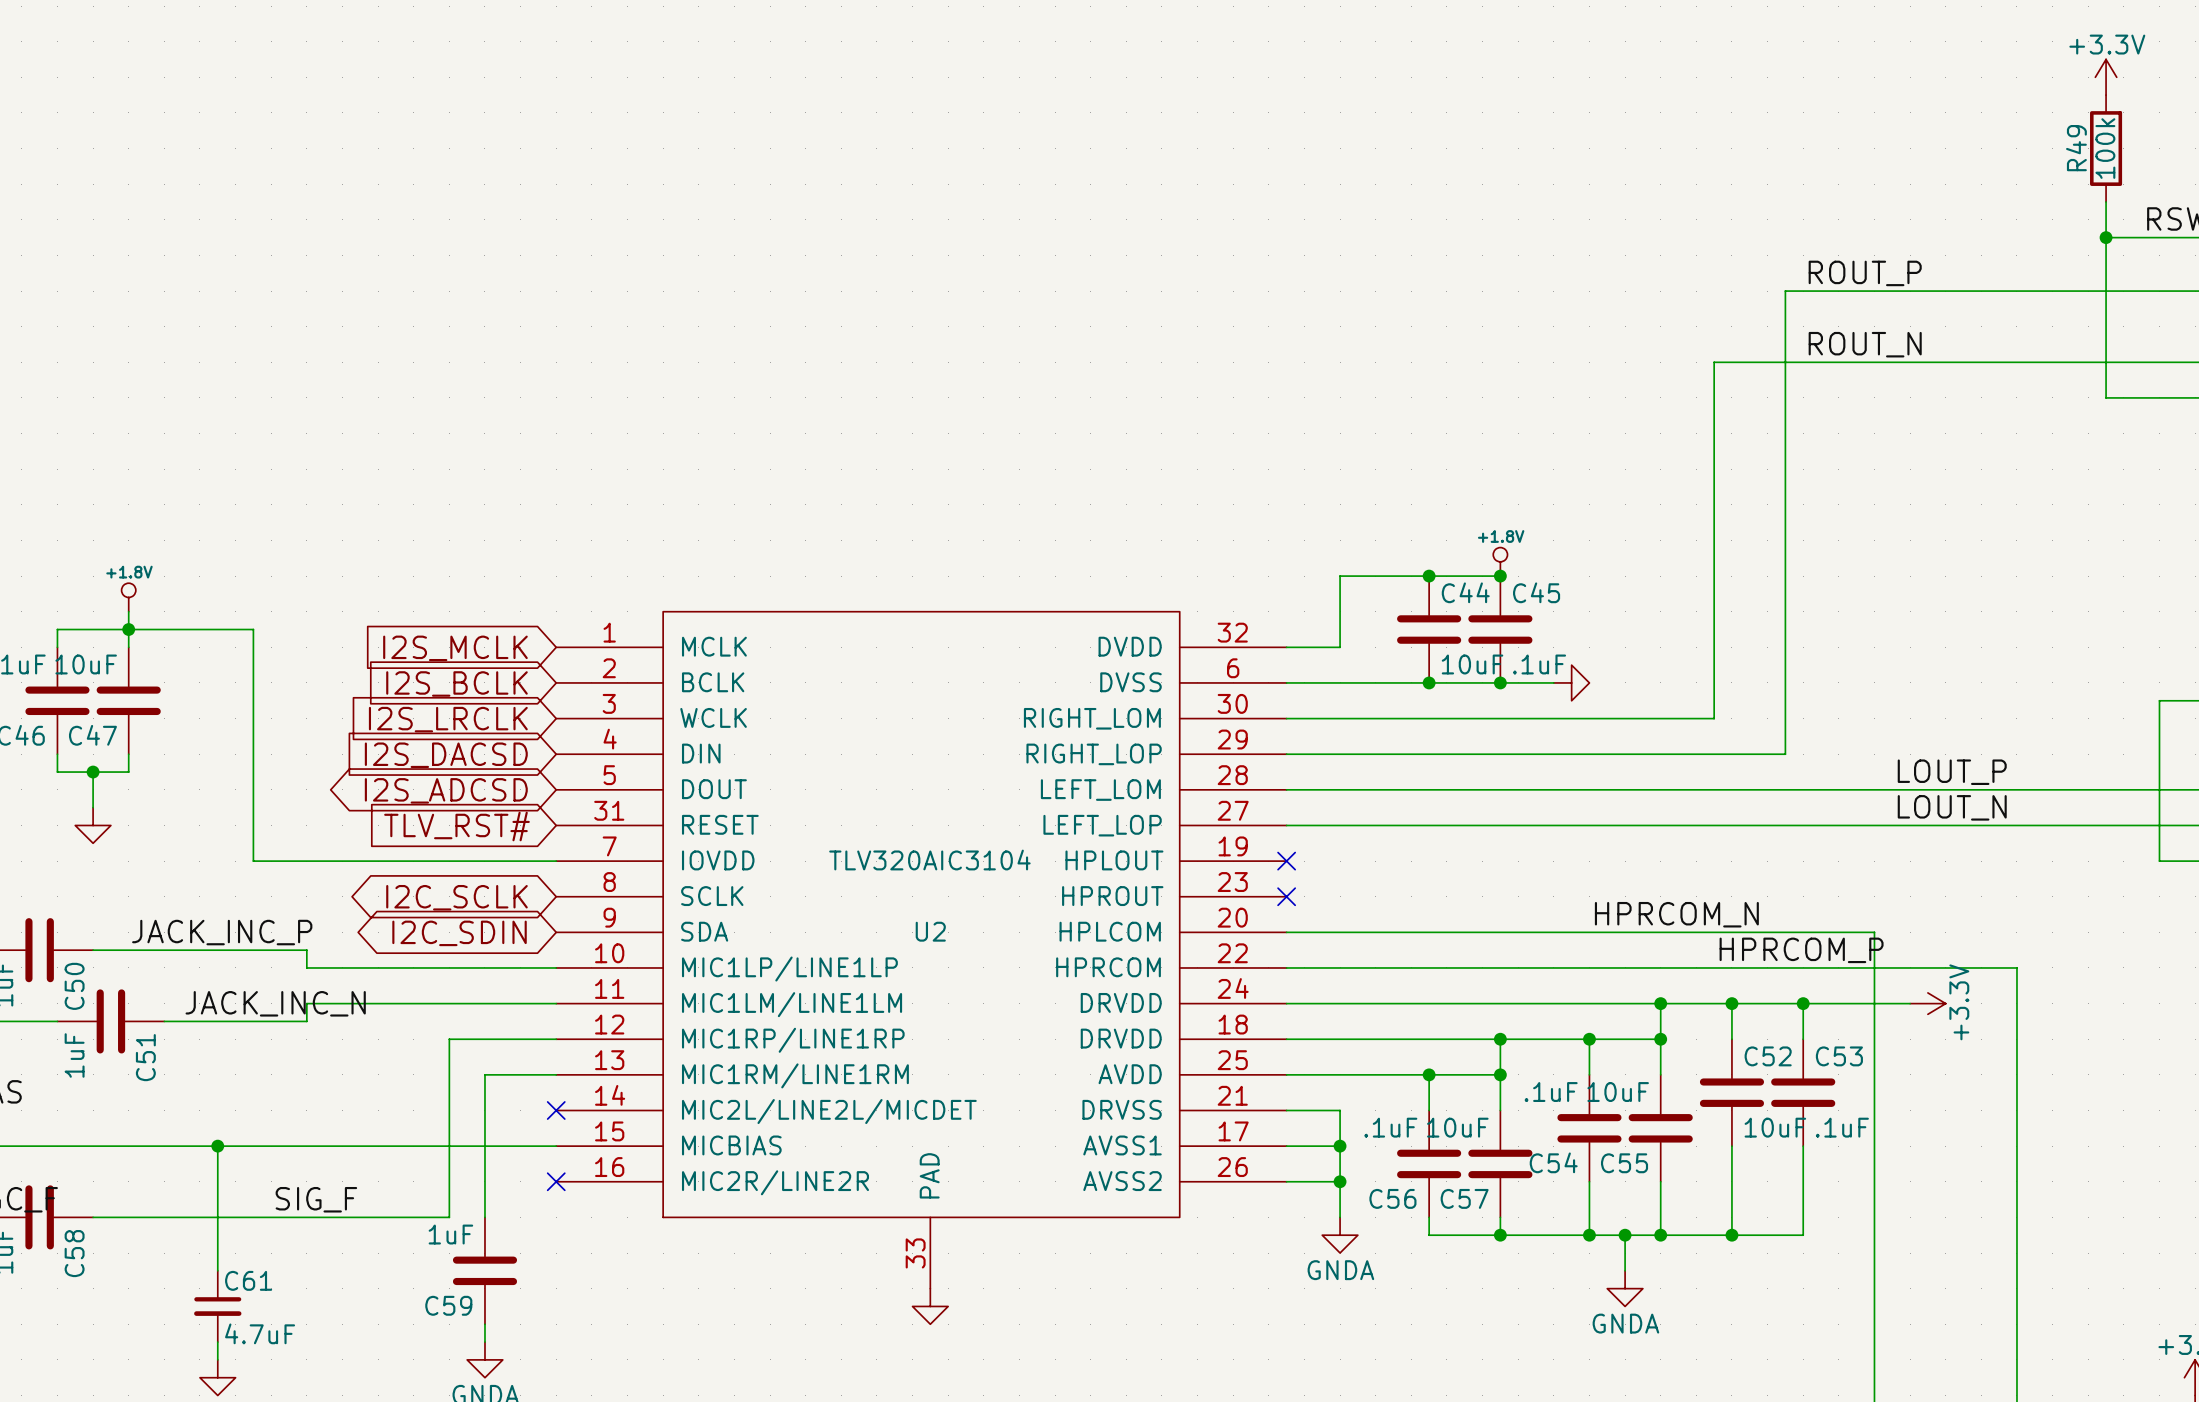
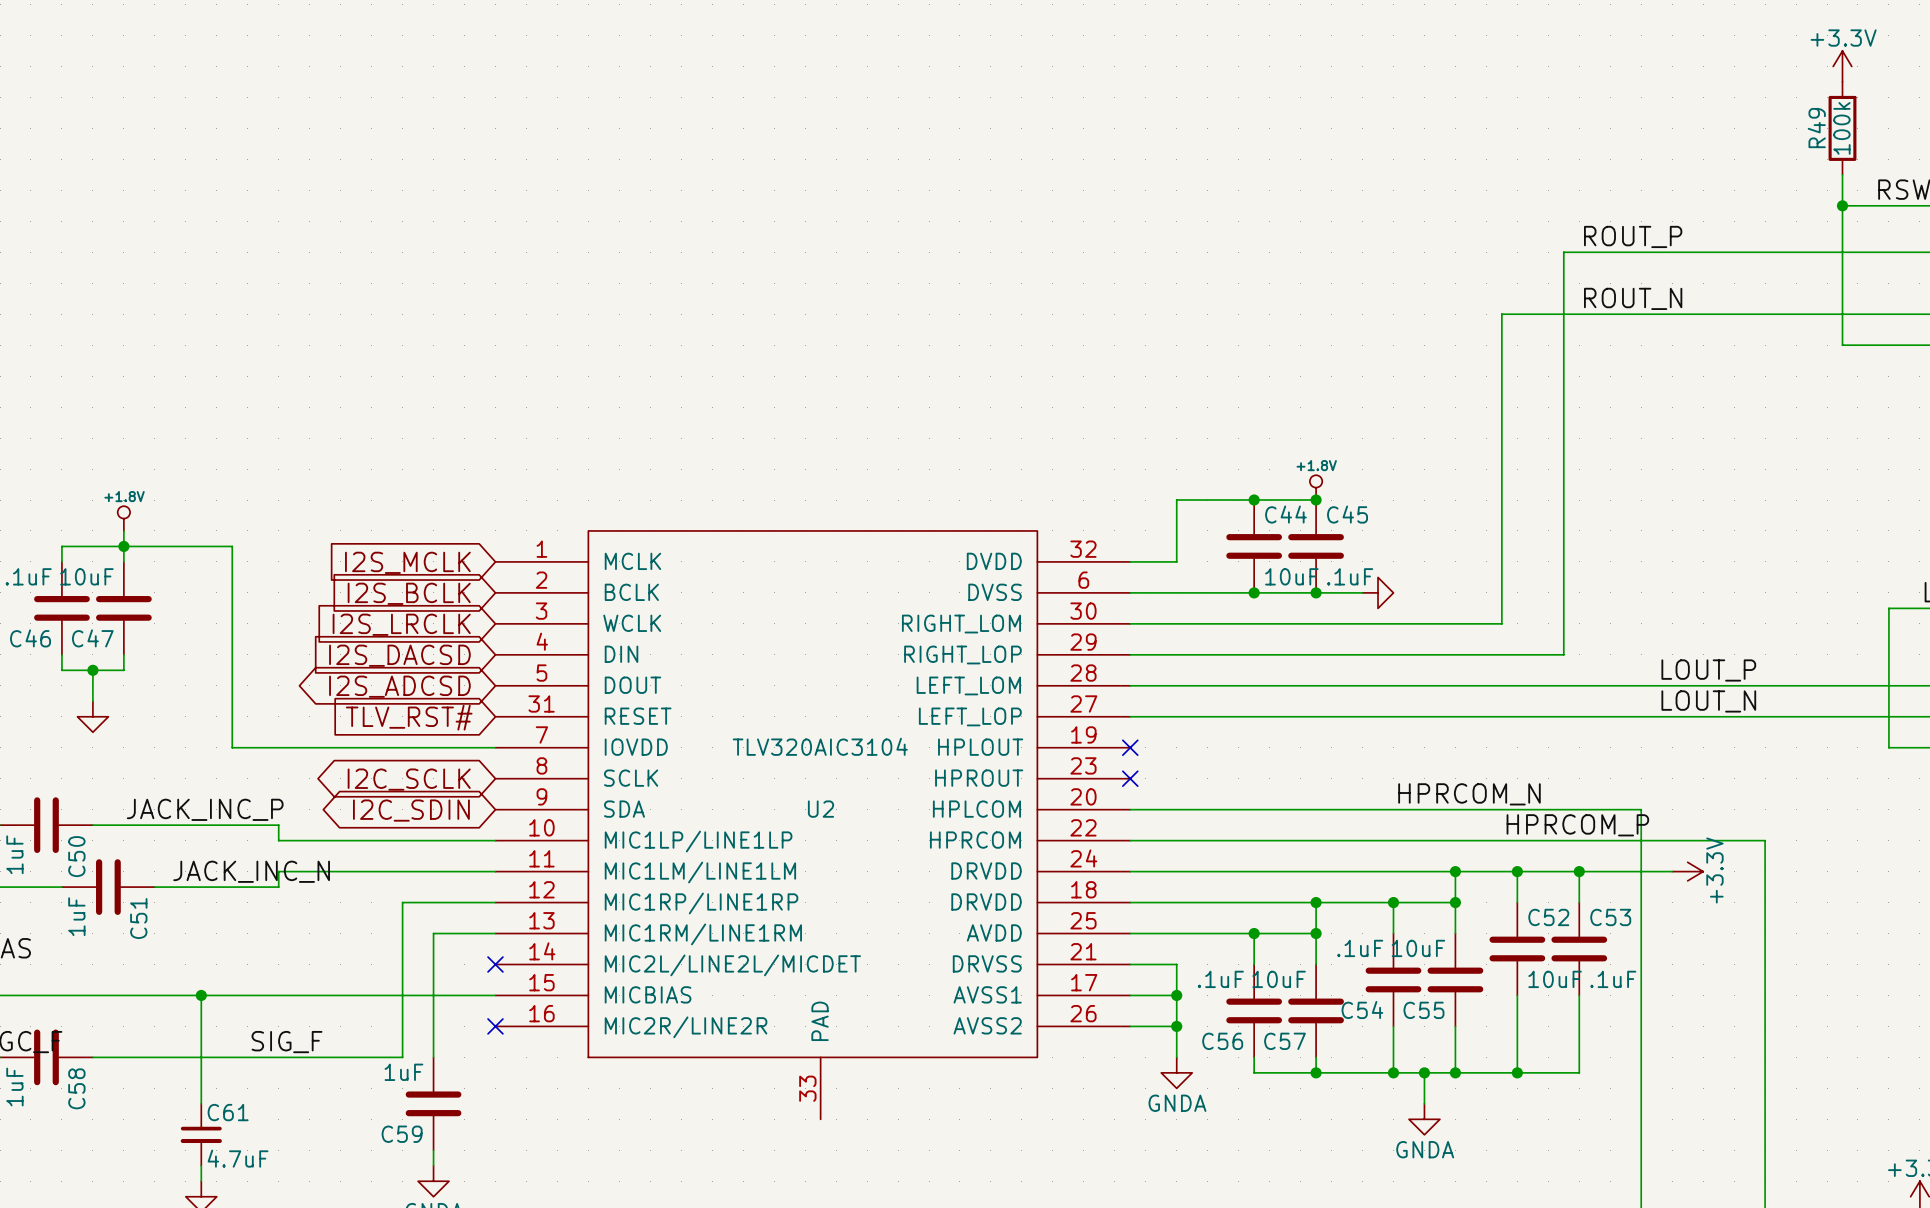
power symbol: (930, 1306) -> none

